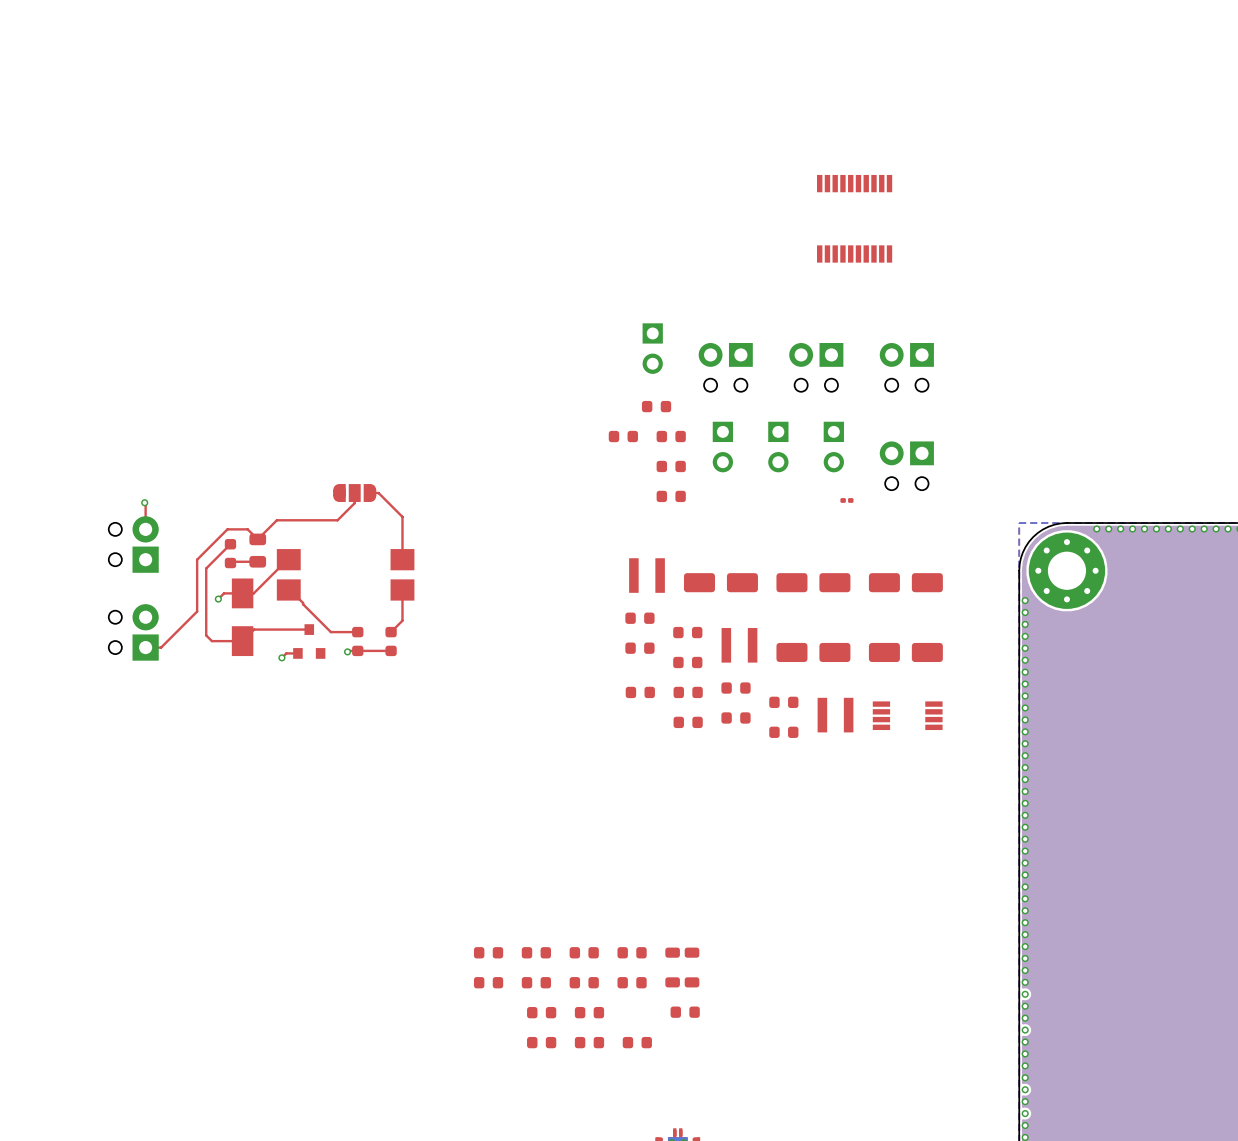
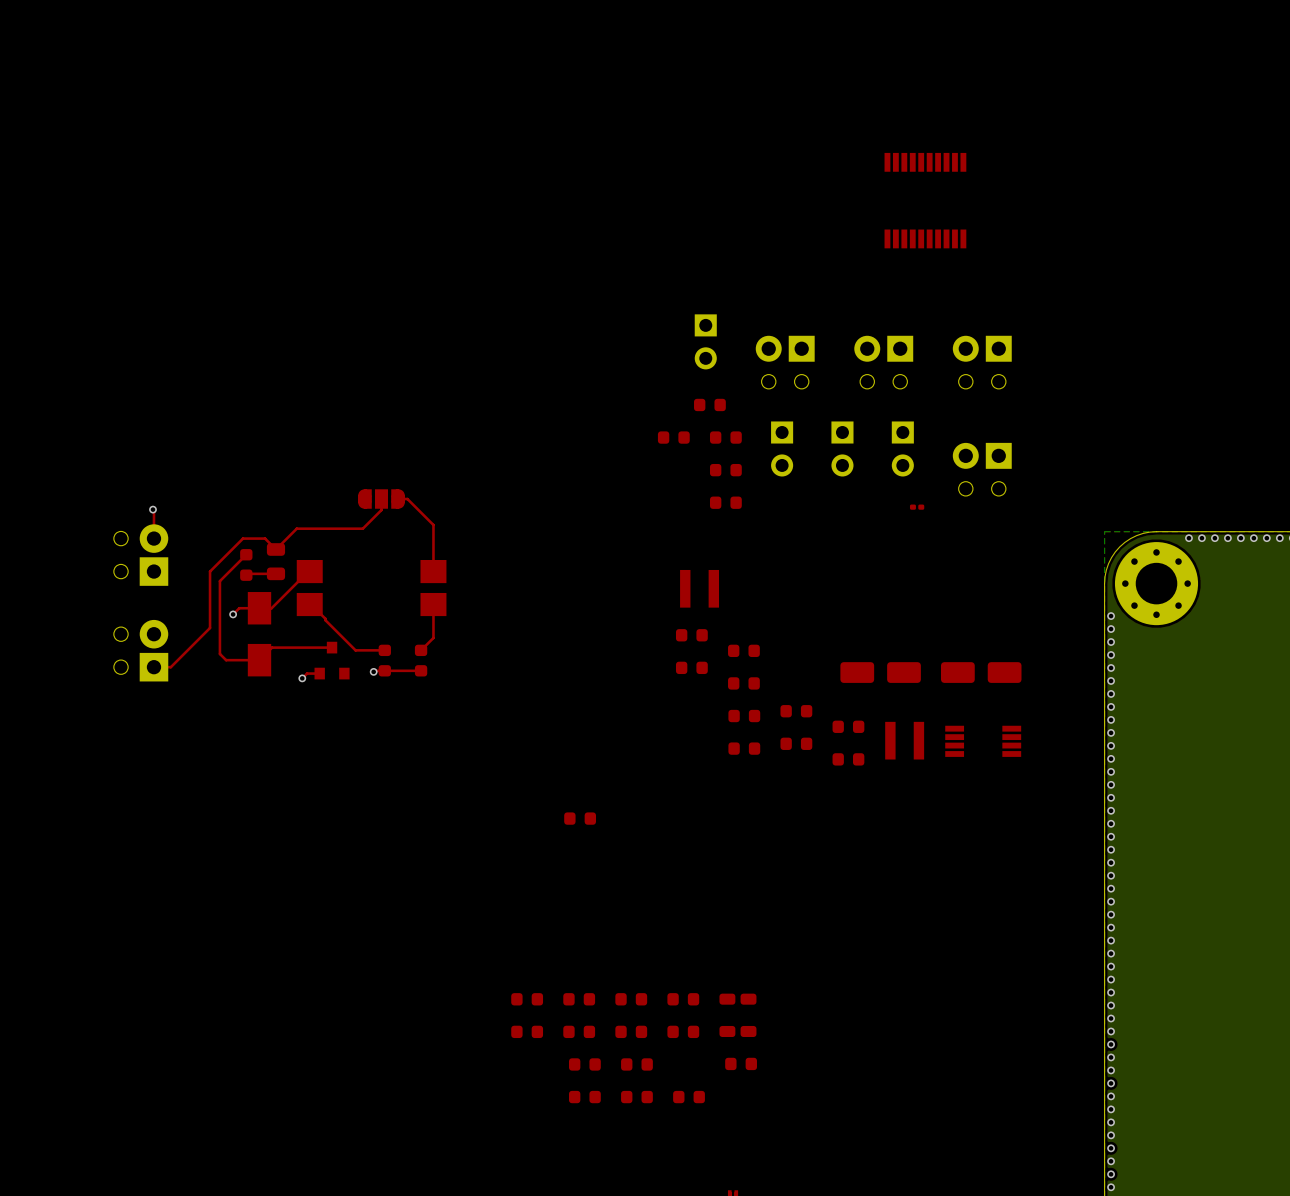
part: (720, 582) -> none
part: (813, 582) -> none
part: (905, 582) -> none
part: (739, 645) -> none
part position: (640, 692) -> (580, 818)

